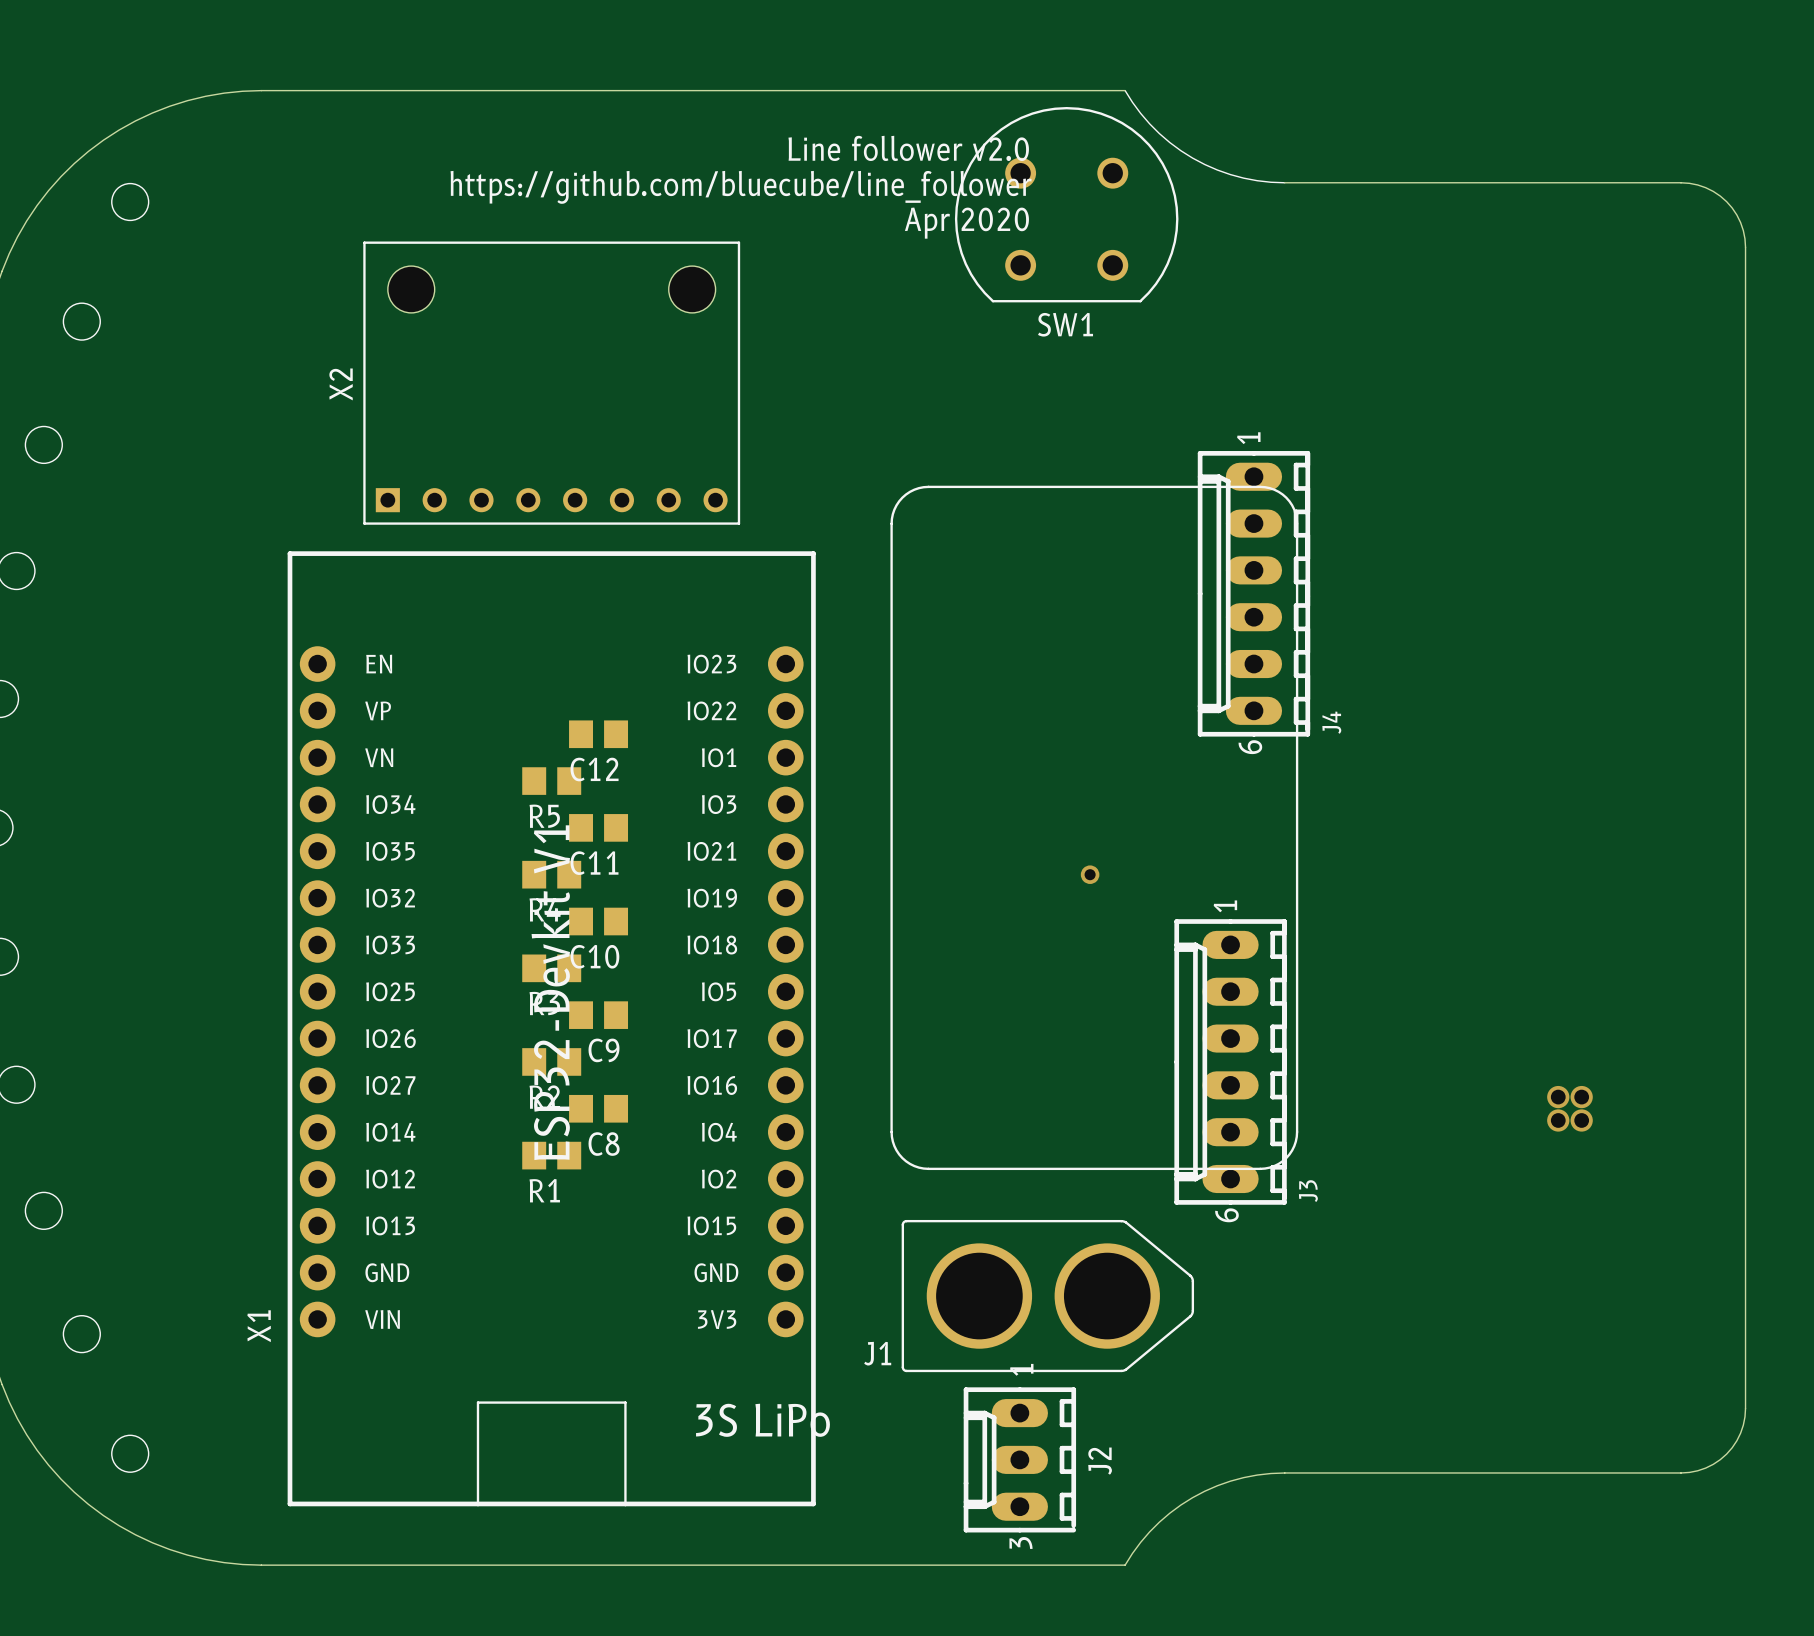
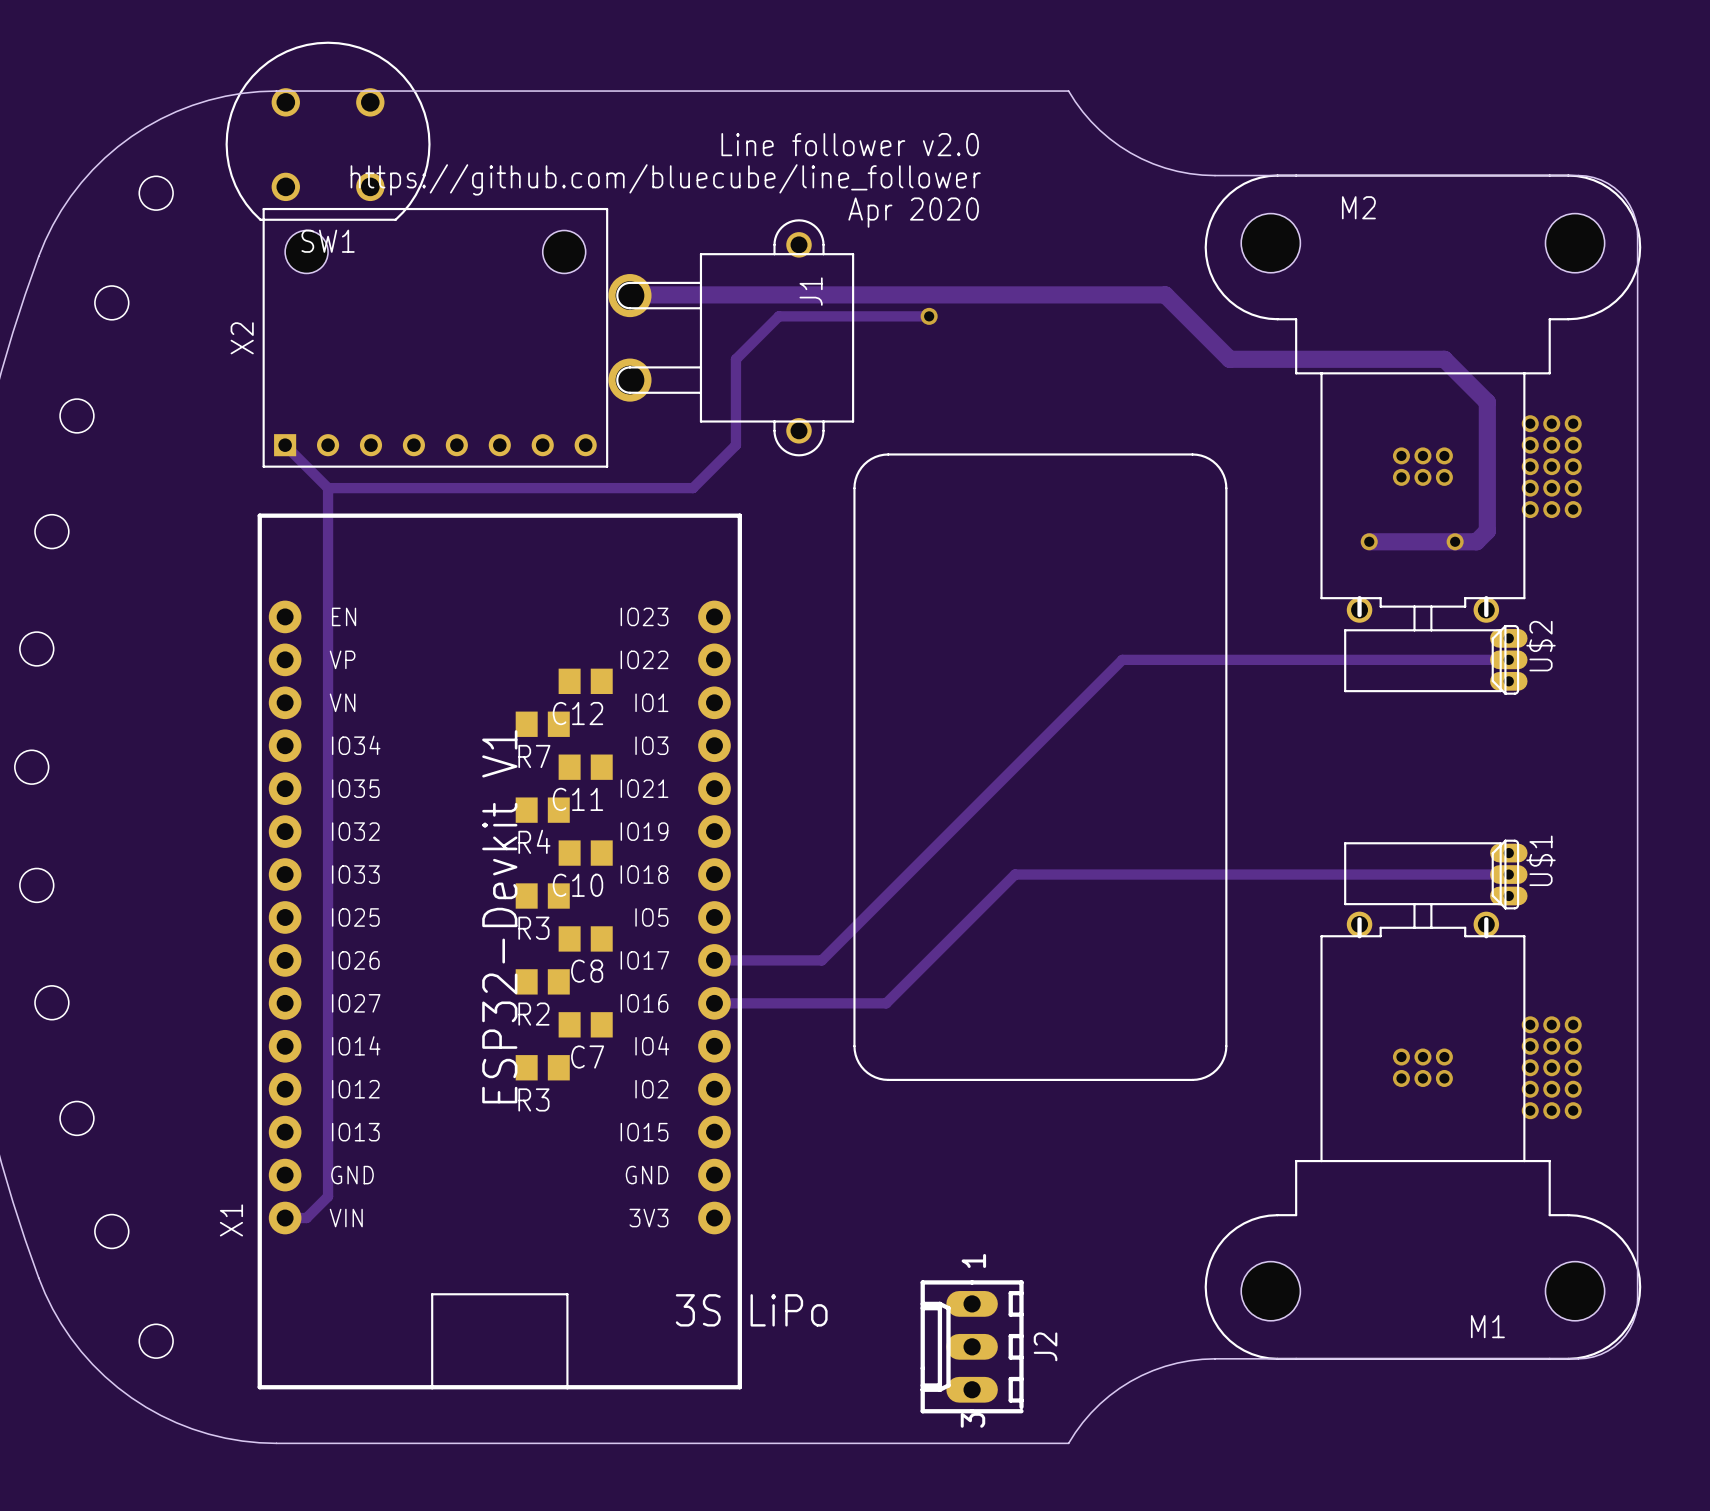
line: (1125, 90) (1149, 123) (1169, 142) (1192, 158) (1217, 170) (1243, 178) (1284, 182) -> none
board edge: none -> (1068, 91) (1091, 121) (1109, 138) (1130, 152) (1153, 163) (1177, 171) (1215, 175)
SW1 position: (1066, 204) -> (328, 131)
track: none -> (628, 294) (1165, 294) (1229, 359) (1444, 359) (1487, 402) (1487, 531) (1476, 541) (1369, 541)
track: none -> (929, 316) (778, 316) (735, 359) (735, 445) (693, 488) (328, 488)
via: none -> (929, 316)
X2 position: (551, 383) -> (435, 337)
via: none -> (1530, 423)
via: none -> (1551, 423)
via: none -> (1573, 423)
M2: none -> (1422, 433)
track: none -> (285, 445) (328, 488)
via: none -> (1530, 445)
via: none -> (1551, 445)
via: none -> (1573, 445)
via: none -> (1401, 455)
via: none -> (1422, 455)
via: none -> (1444, 455)
via: none -> (1530, 466)
via: none -> (1551, 466)
via: none -> (1573, 466)
via: none -> (1401, 477)
via: none -> (1422, 477)
via: none -> (1444, 477)
track: none -> (328, 488) (328, 1196) (306, 1218) (285, 1218)
via: none -> (1530, 488)
via: none -> (1551, 488)
via: none -> (1573, 488)
via: none -> (1530, 509)
via: none -> (1551, 509)
via: none -> (1573, 509)
via: none -> (1369, 541)
via: none -> (1455, 541)
J4: (1253, 593) -> none
track: none -> (1508, 659) (1122, 659) (821, 960) (714, 960)
U$2: none -> (1508, 659)
R5 name: R5 (544, 816) -> R7 (534, 756)
via: (1090, 874) -> none
track: none -> (1508, 874) (1015, 874) (886, 1003) (714, 1003)
U$1: none -> (1508, 874)
X1 position: (551, 1028) -> (499, 951)
C9 name: C9 (603, 1050) -> C8 (587, 971)
J3: (1230, 1061) -> none
via: (1558, 1097) -> none
via: (1581, 1097) -> none
via: none -> (1530, 1024)
via: none -> (1551, 1024)
via: none -> (1573, 1024)
via: (1558, 1120) -> none
via: (1581, 1120) -> none
via: none -> (1530, 1046)
via: none -> (1551, 1046)
via: none -> (1573, 1046)
via: none -> (1401, 1057)
via: none -> (1422, 1057)
via: none -> (1444, 1057)
C8 name: C8 (604, 1144) -> C7 (587, 1057)
via: none -> (1530, 1067)
via: none -> (1551, 1067)
via: none -> (1573, 1067)
via: none -> (1401, 1078)
via: none -> (1422, 1078)
via: none -> (1444, 1078)
via: none -> (1530, 1089)
via: none -> (1551, 1089)
via: none -> (1573, 1089)
R1 name: R1 (544, 1190) -> R3 (533, 1099)
M1: none -> (1422, 1101)
via: none -> (1530, 1110)
via: none -> (1551, 1110)
via: none -> (1573, 1110)
J1 footprint: [901, 1219, 1195, 1373] -> [608, 219, 855, 457]
J1 name position: J1 (877, 1353) -> J1 (811, 291)

